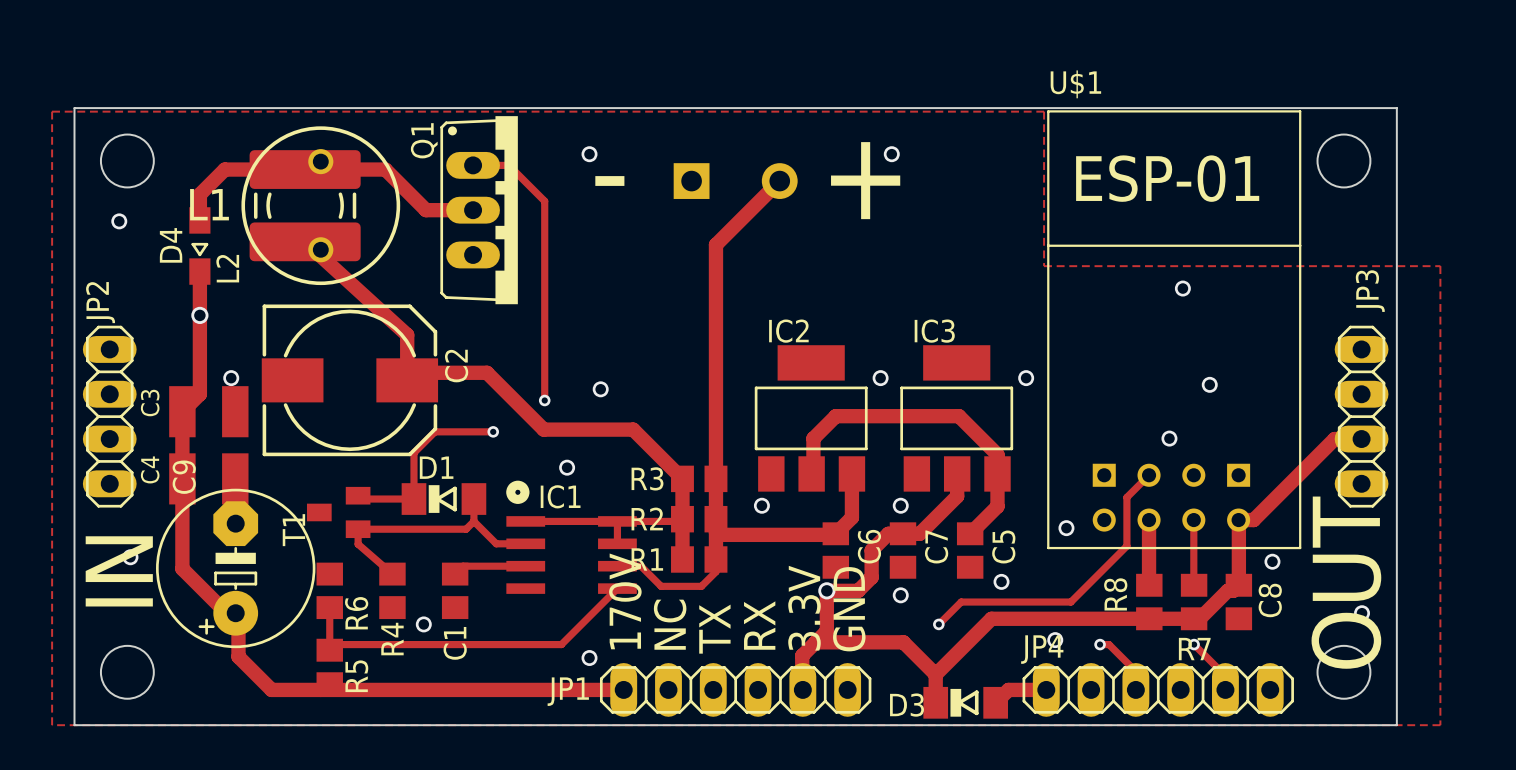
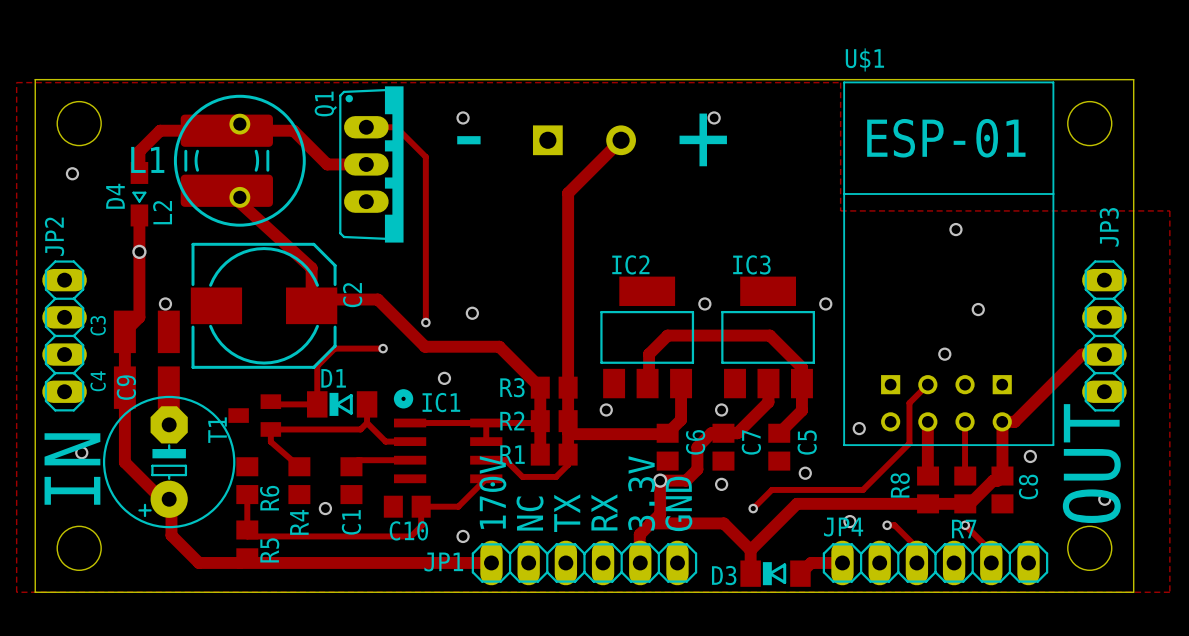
C10: none -> (407, 506)
track: none -> (421, 506) (422, 525) (410, 536) (247, 536) (247, 529)
track: (583, 622) (561, 644) (329, 644) -> (458, 506) (425, 506) (421, 511)

